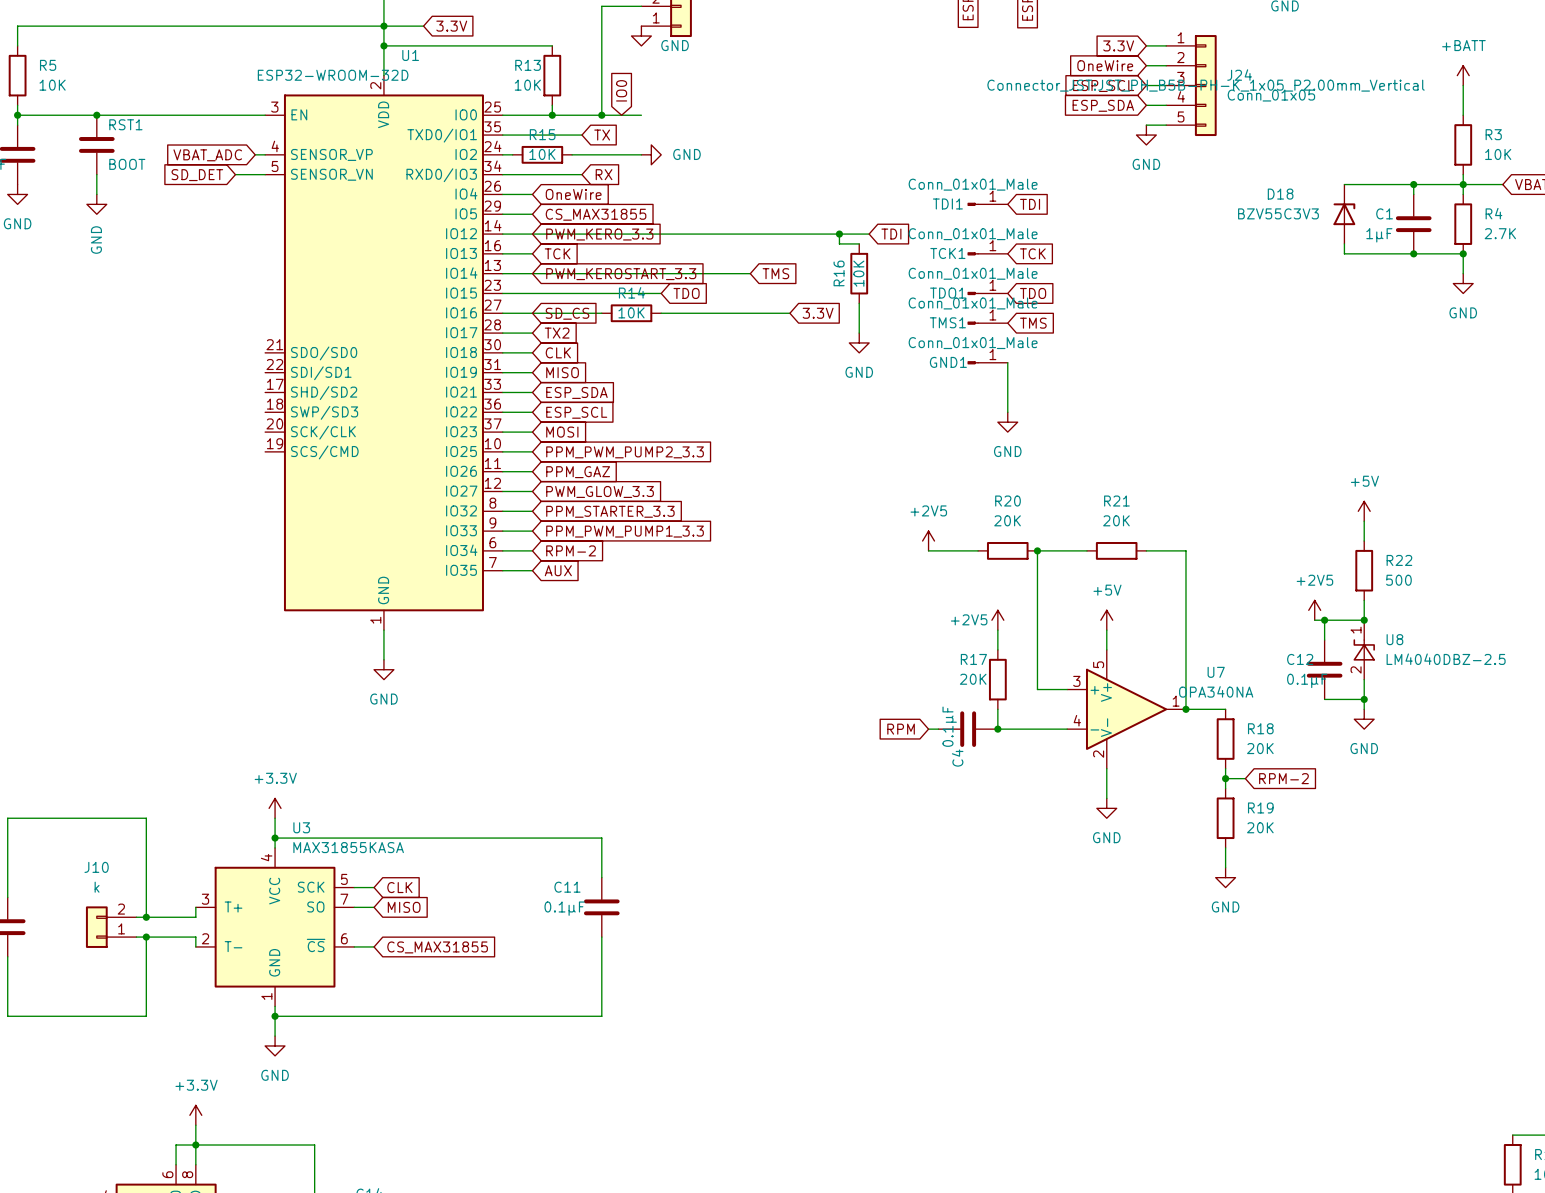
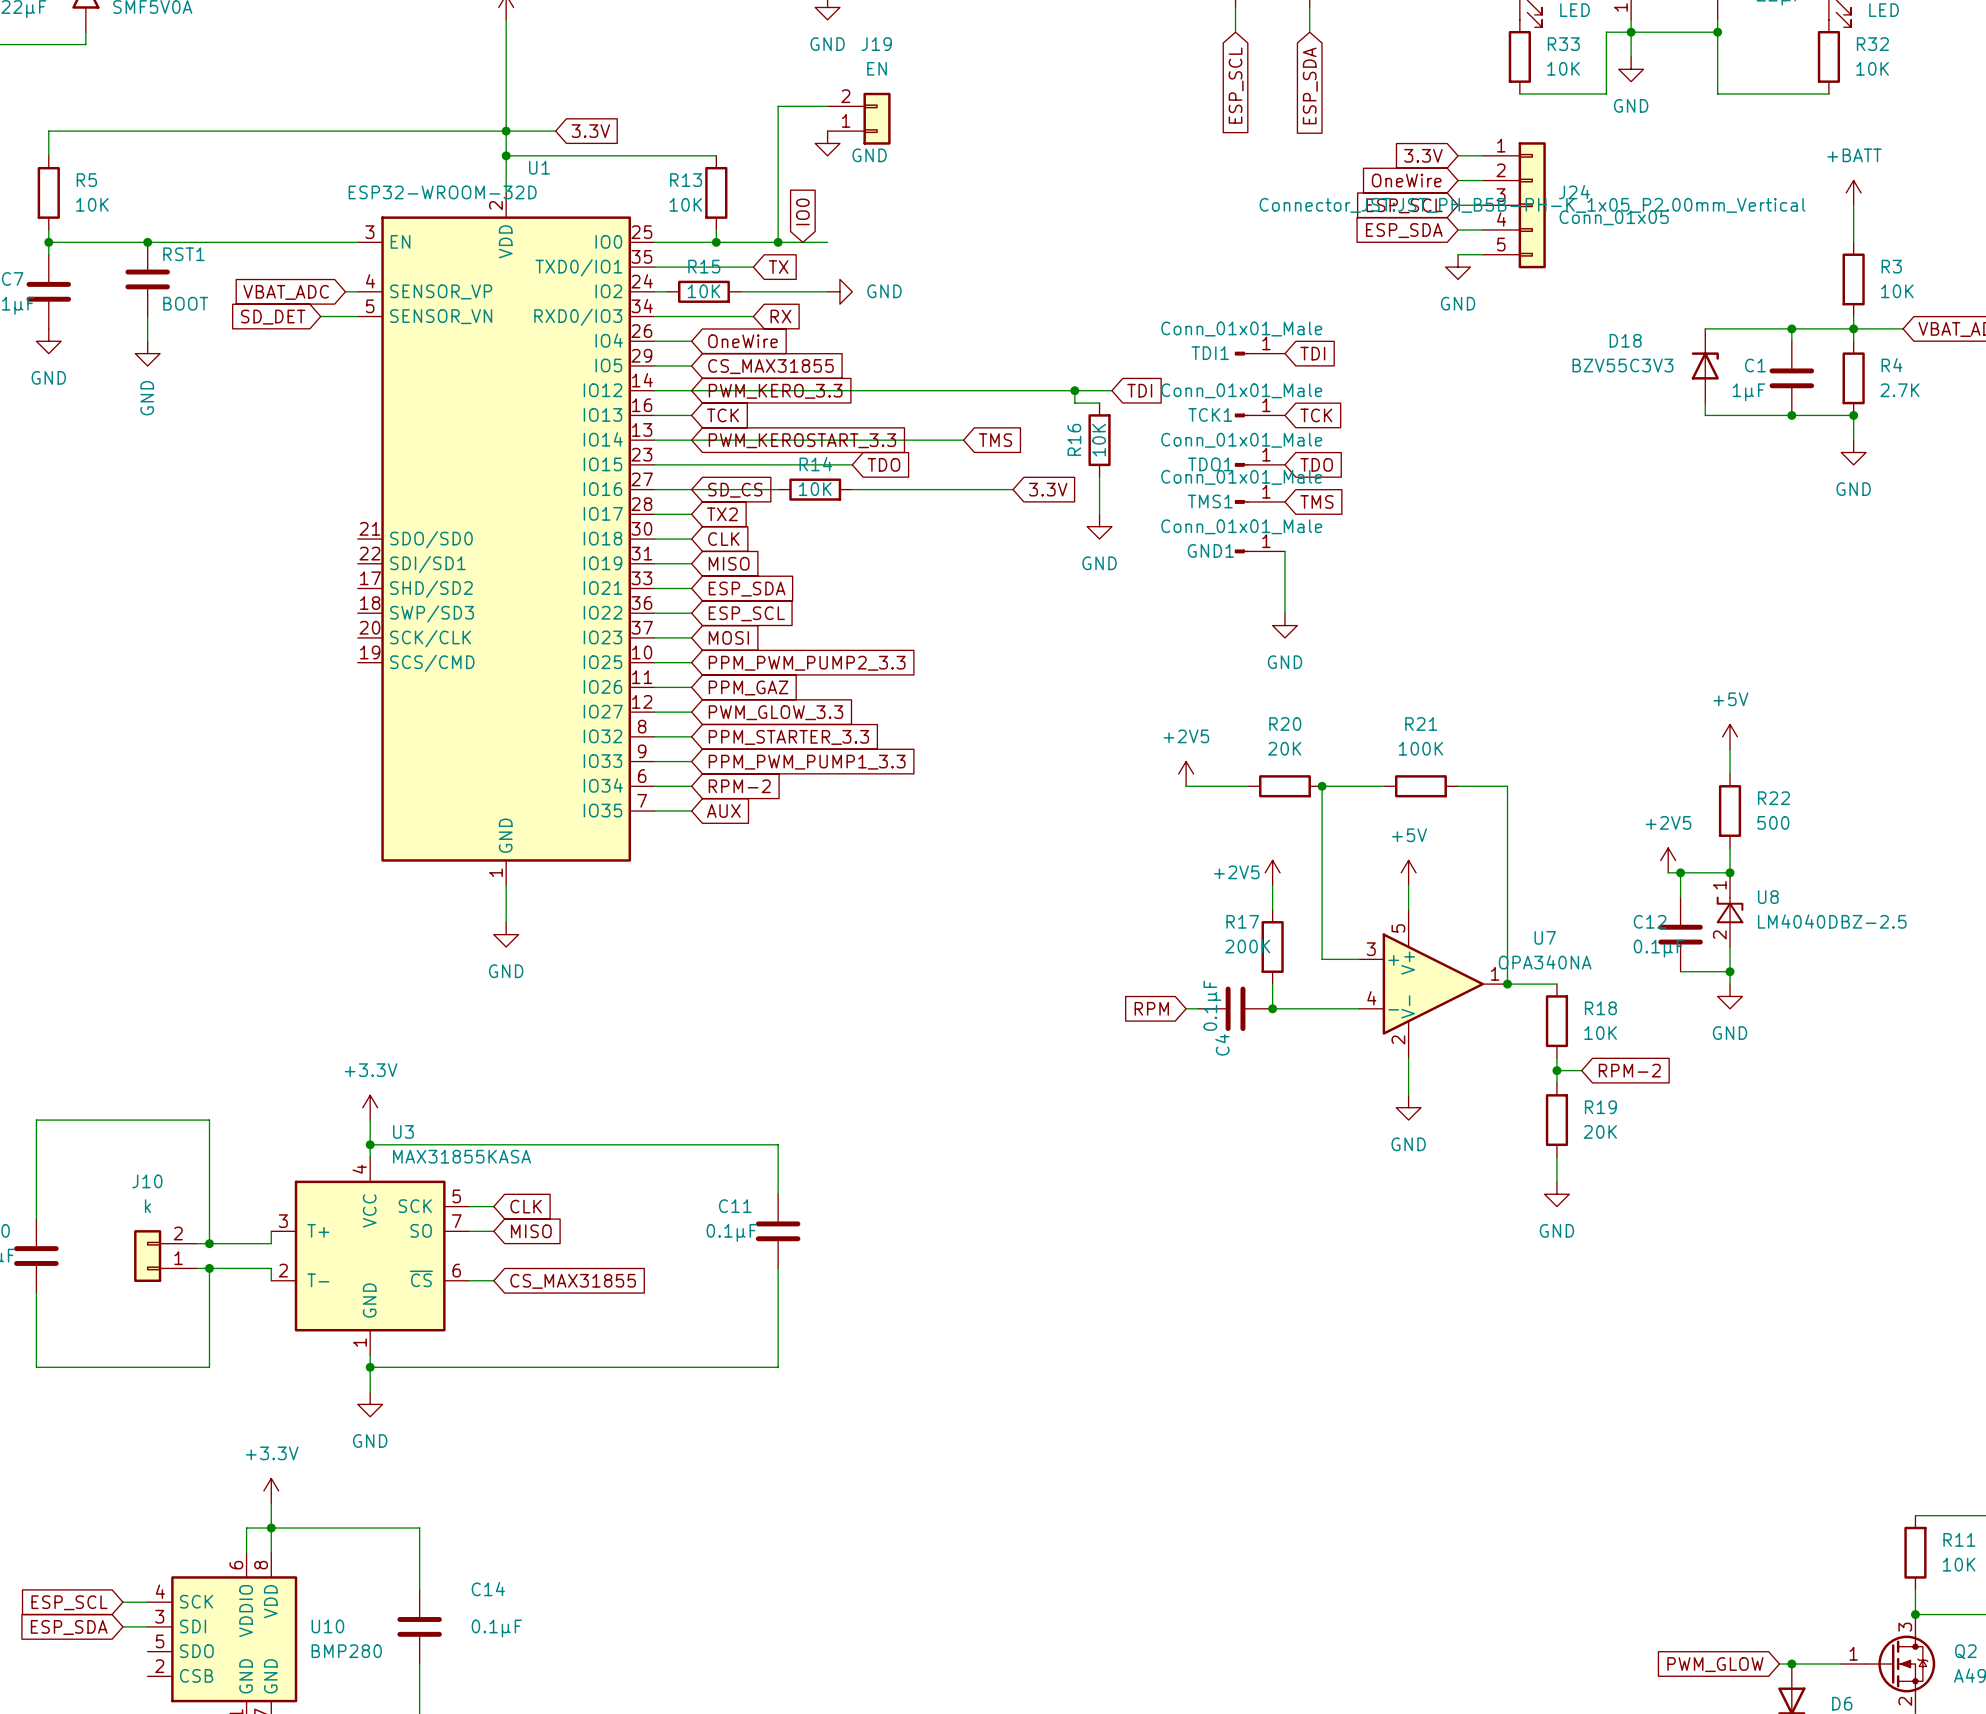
R21 value: 20K (1116, 520) -> 100K (1420, 748)
R17 value: 20K (973, 679) -> 200K (1247, 946)
R18 value: 20K (1260, 748) -> 10K (1600, 1033)

